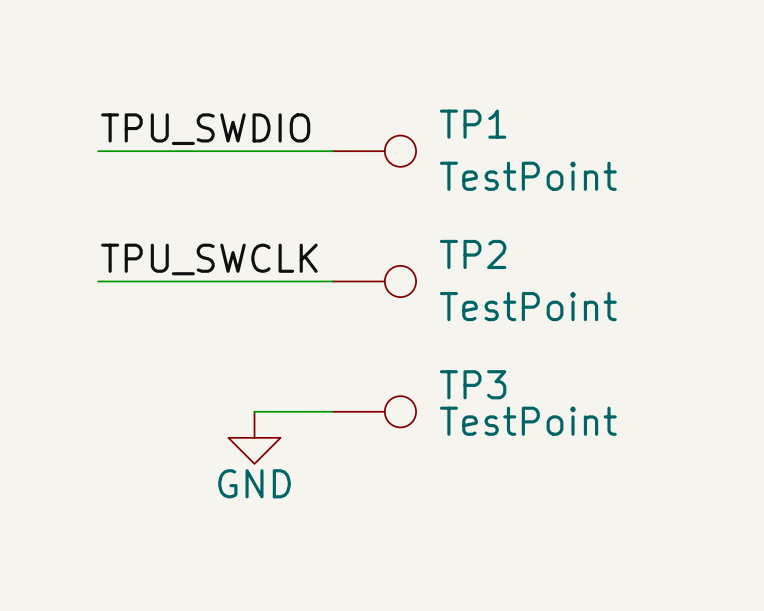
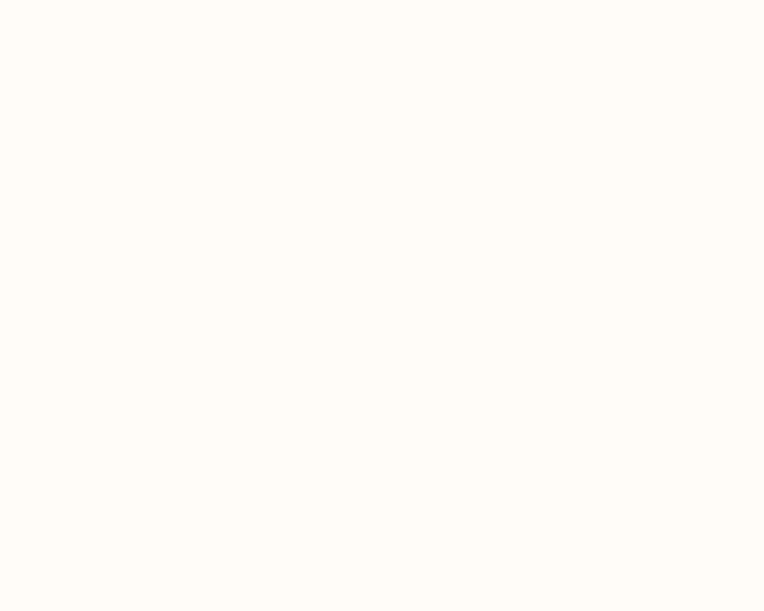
label: TPU_SWDIO (205, 129) -> none
wire: (98, 151) (332, 151) -> none
TP1: TestPoint (374, 151) -> none
label: TPU_SWCLK (209, 259) -> none
wire: (98, 281) (332, 281) -> none
TP2: TestPoint (374, 281) -> none
wire: (254, 411) (332, 411) -> none
TP3: TestPoint (374, 411) -> none
power symbol: GND (254, 437) -> none

